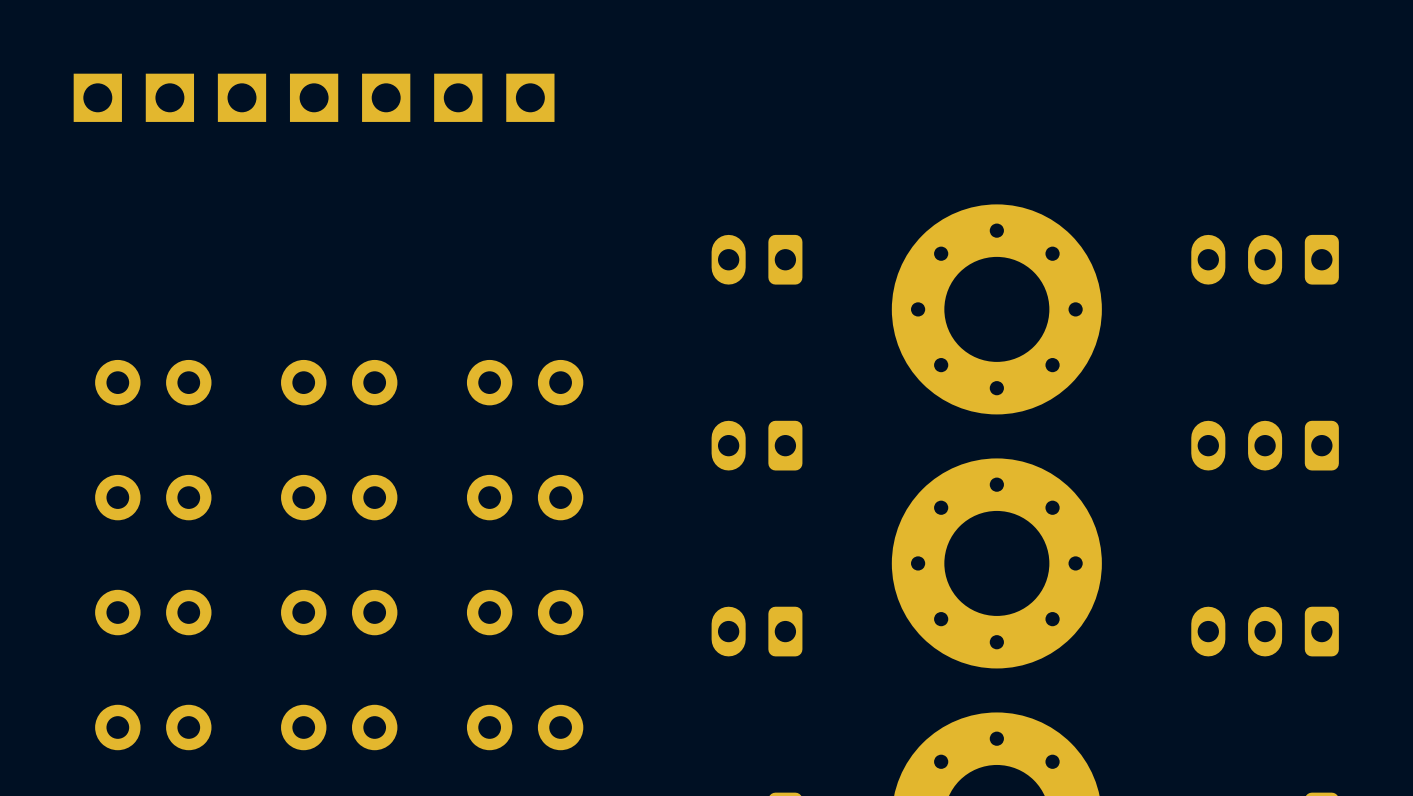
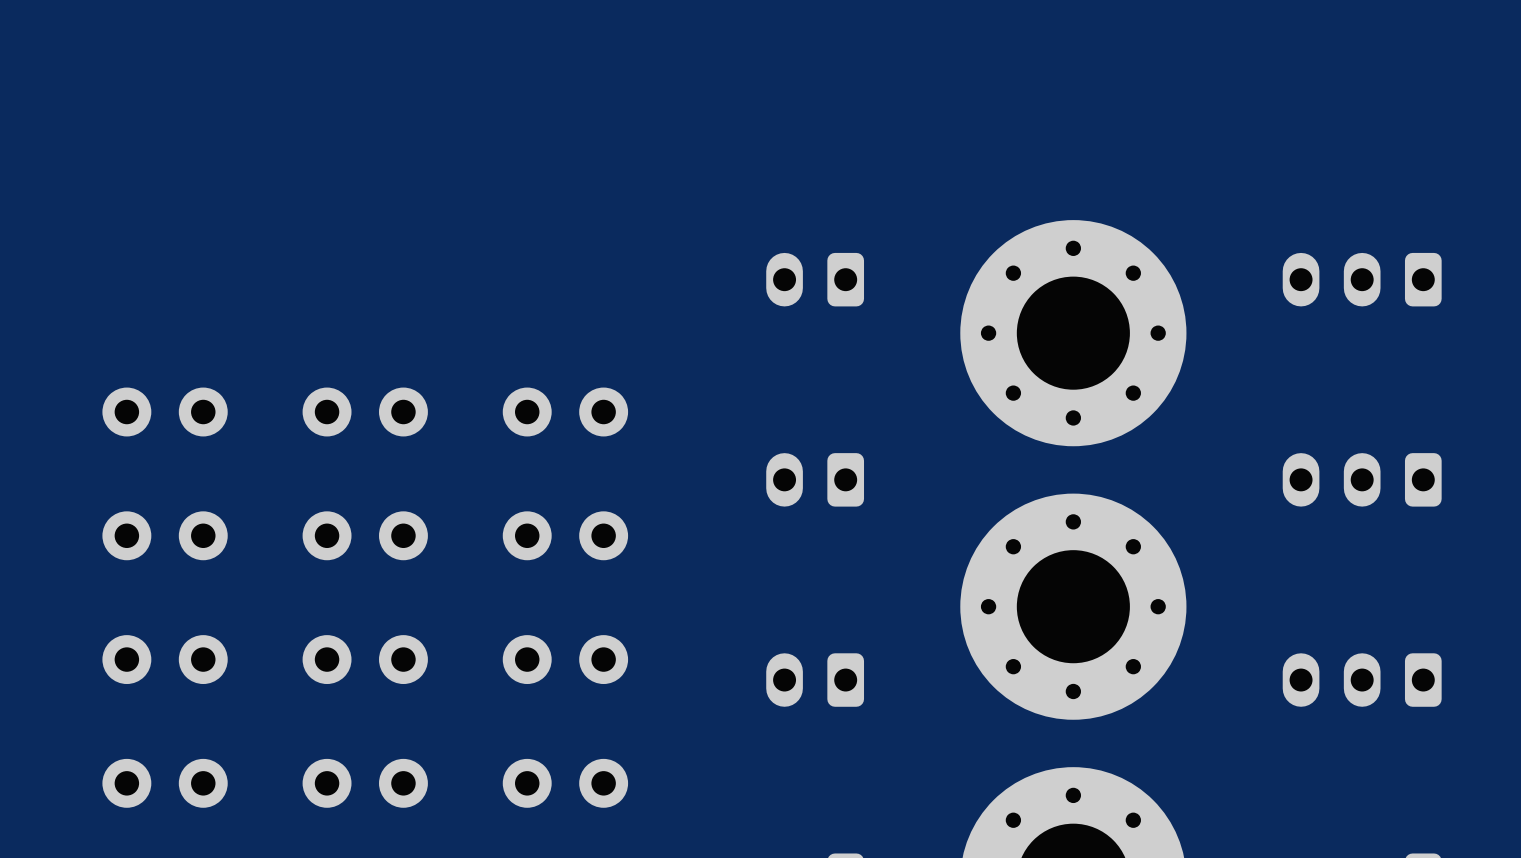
part: (314, 97) -> none

